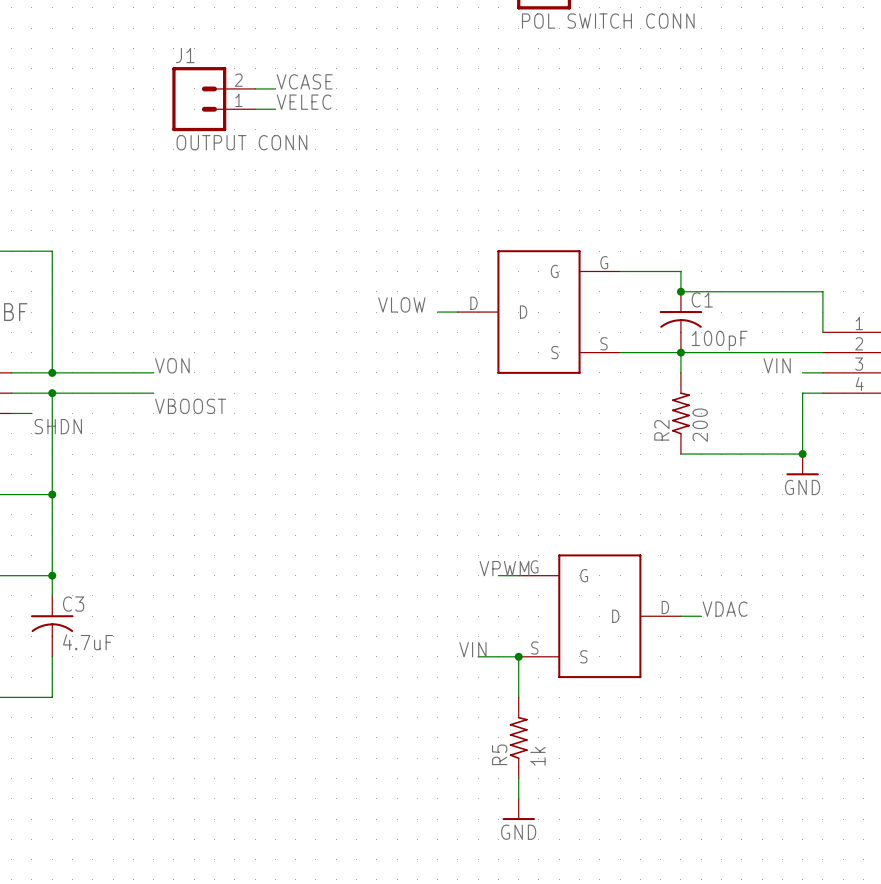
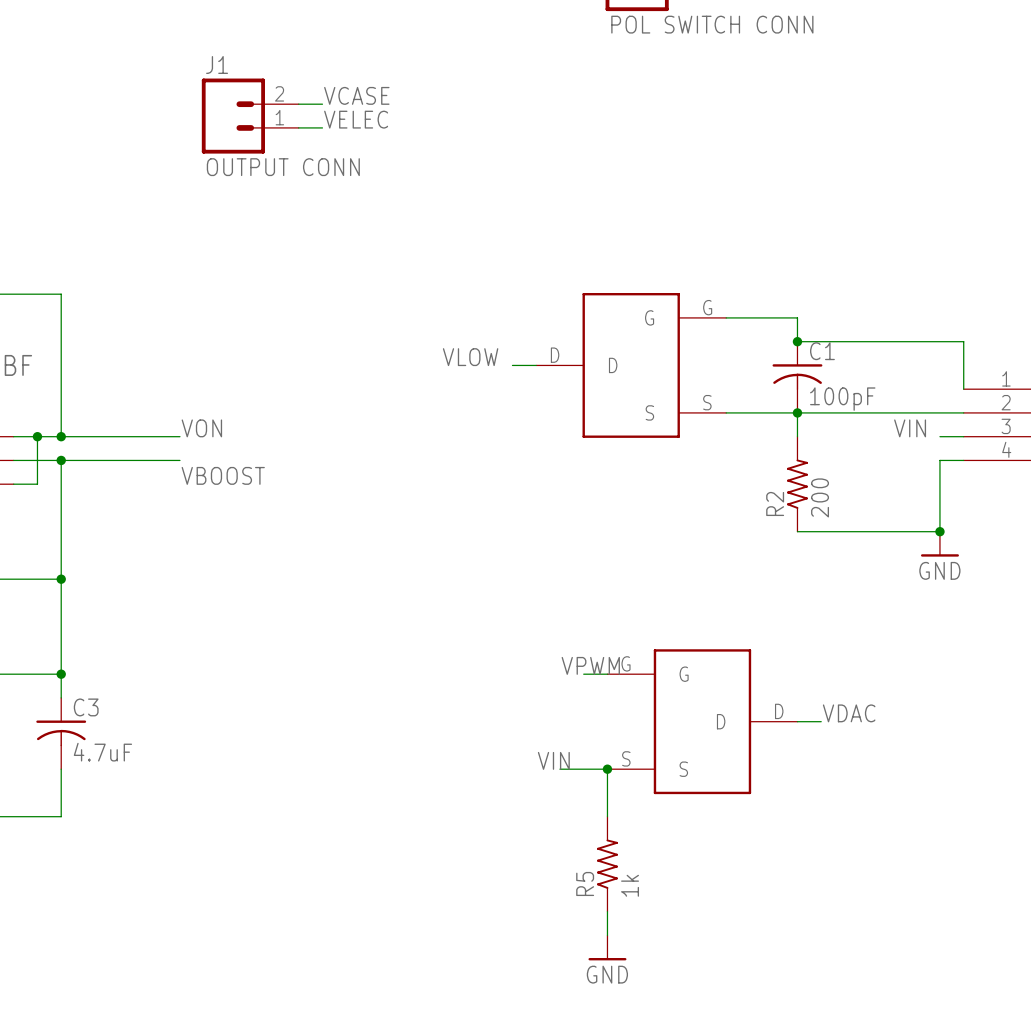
wire: none -> (37, 436) (37, 484)
junction: none -> (37, 436)
label: SHDN (58, 426) -> none

